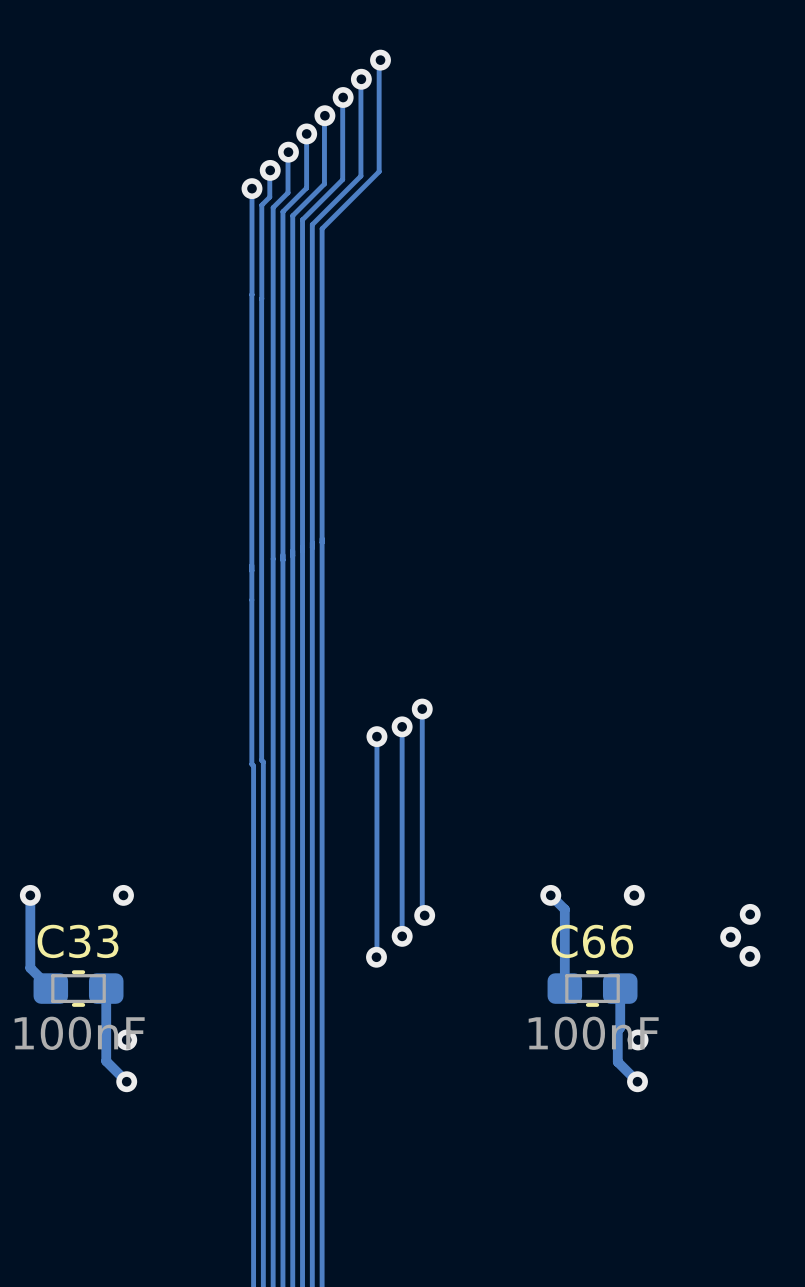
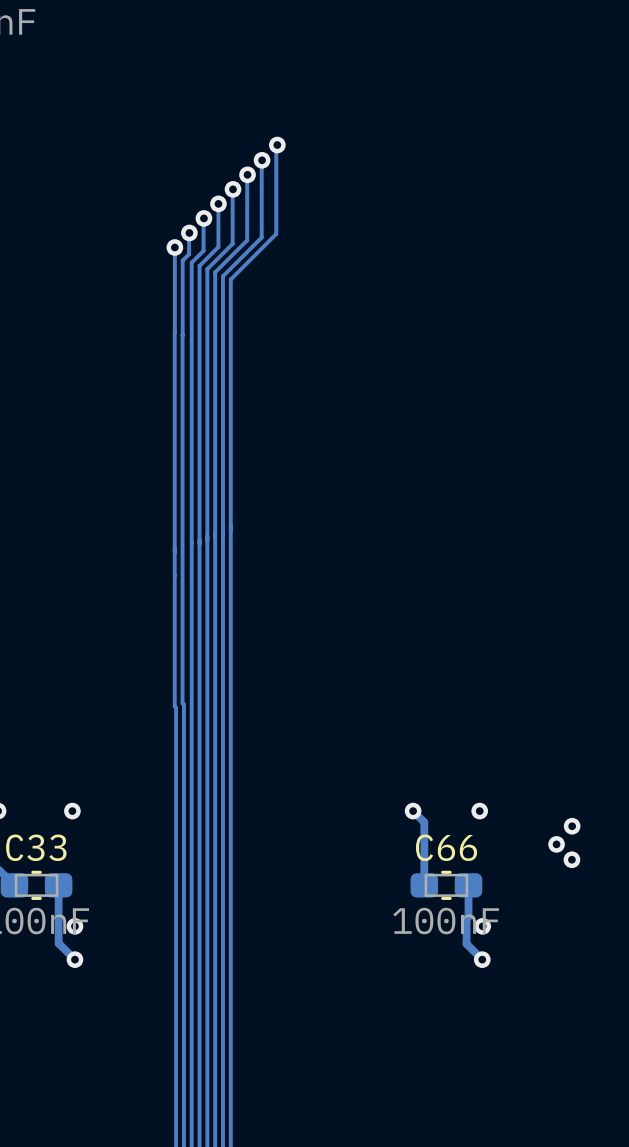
track: (422, 709) (422, 913) (424, 915) -> none
via: (422, 709) -> none
track: (402, 726) (402, 936) -> none
via: (402, 726) -> none
track: (376, 736) (376, 957) -> none
via: (376, 736) -> none
via: (424, 915) -> none
via: (402, 936) -> none
via: (376, 957) -> none

